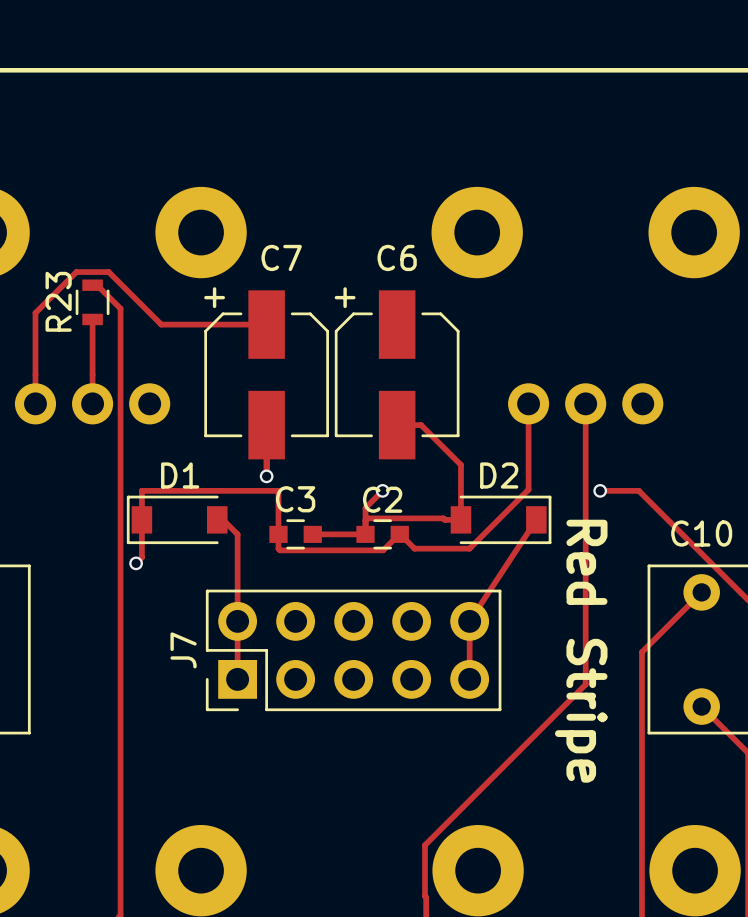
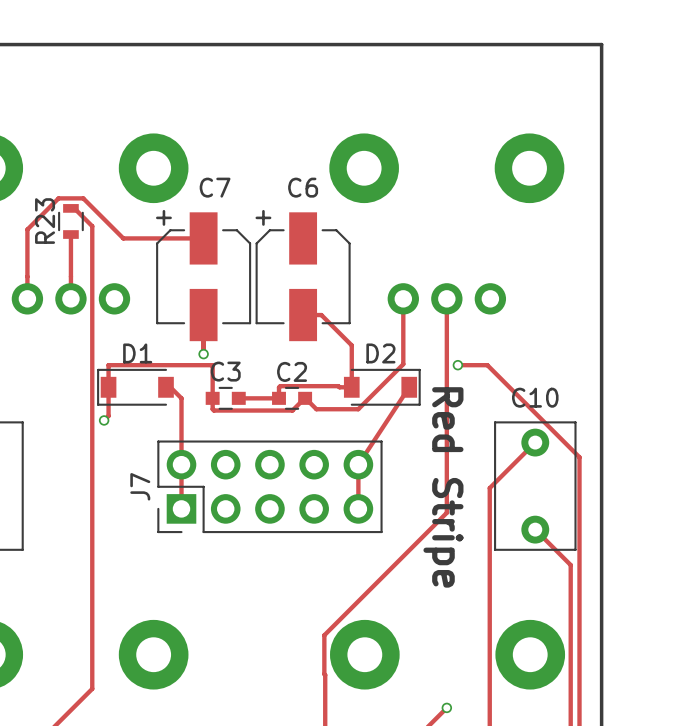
track: (382, 490) (365, 507) (365, 520) -> none
via: (382, 490) -> none

